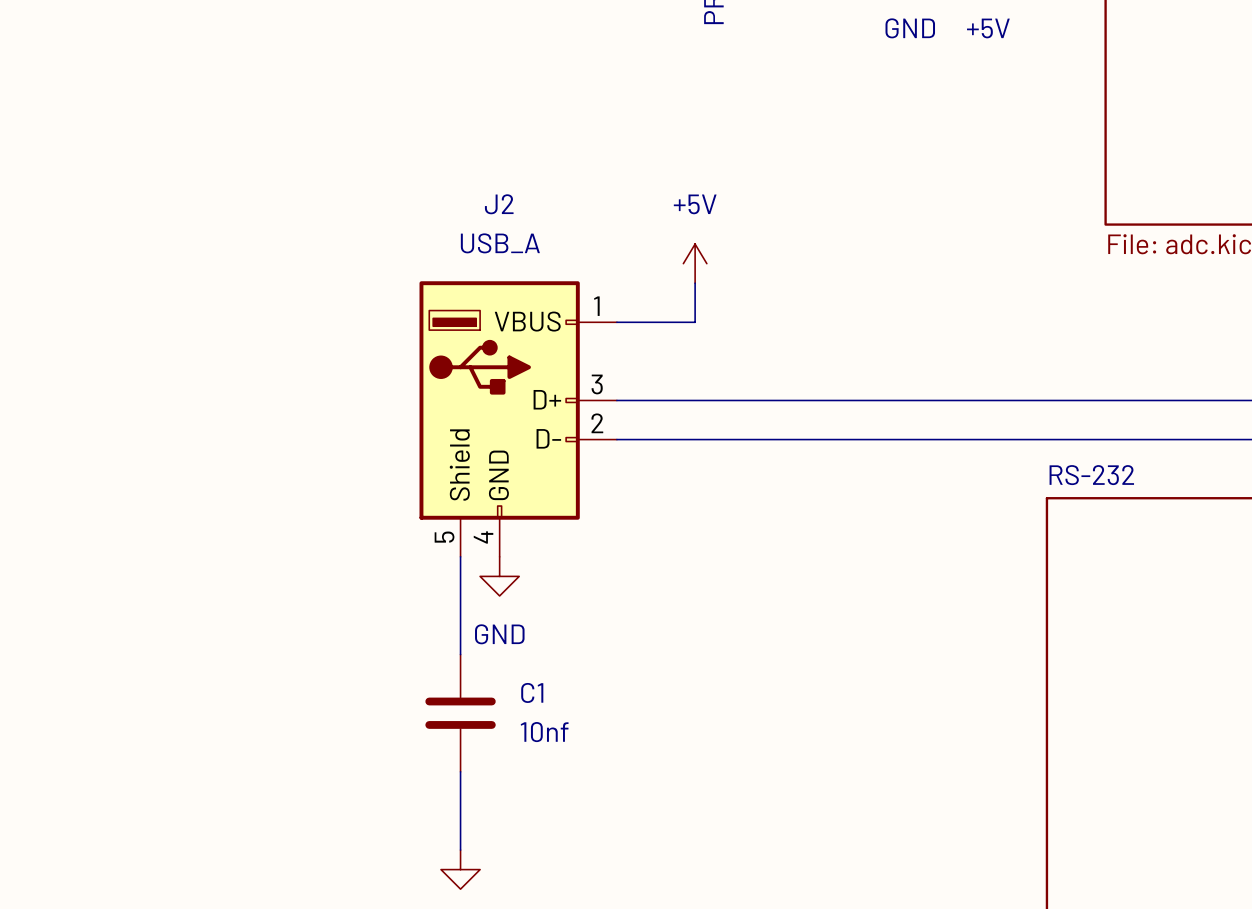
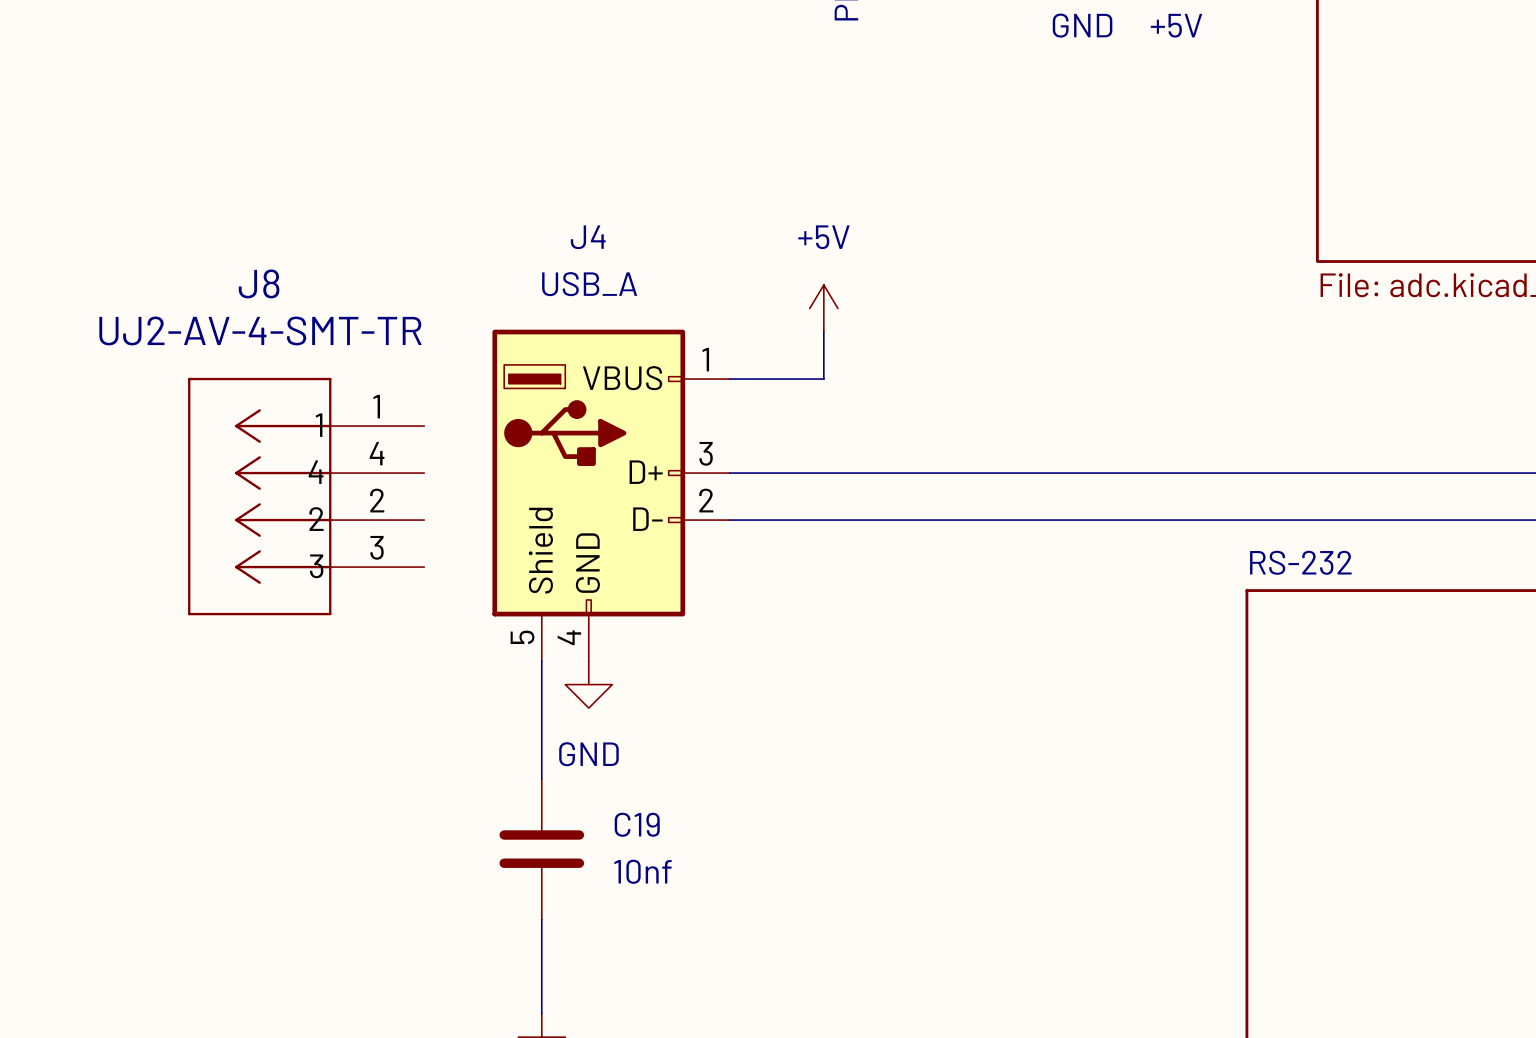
J2 name: J2 (499, 204) -> J4 (588, 237)
J8: none -> UJ2-AV-4-SMT-TR (306, 496)
C1 name: C1 (532, 692) -> C19 (637, 824)

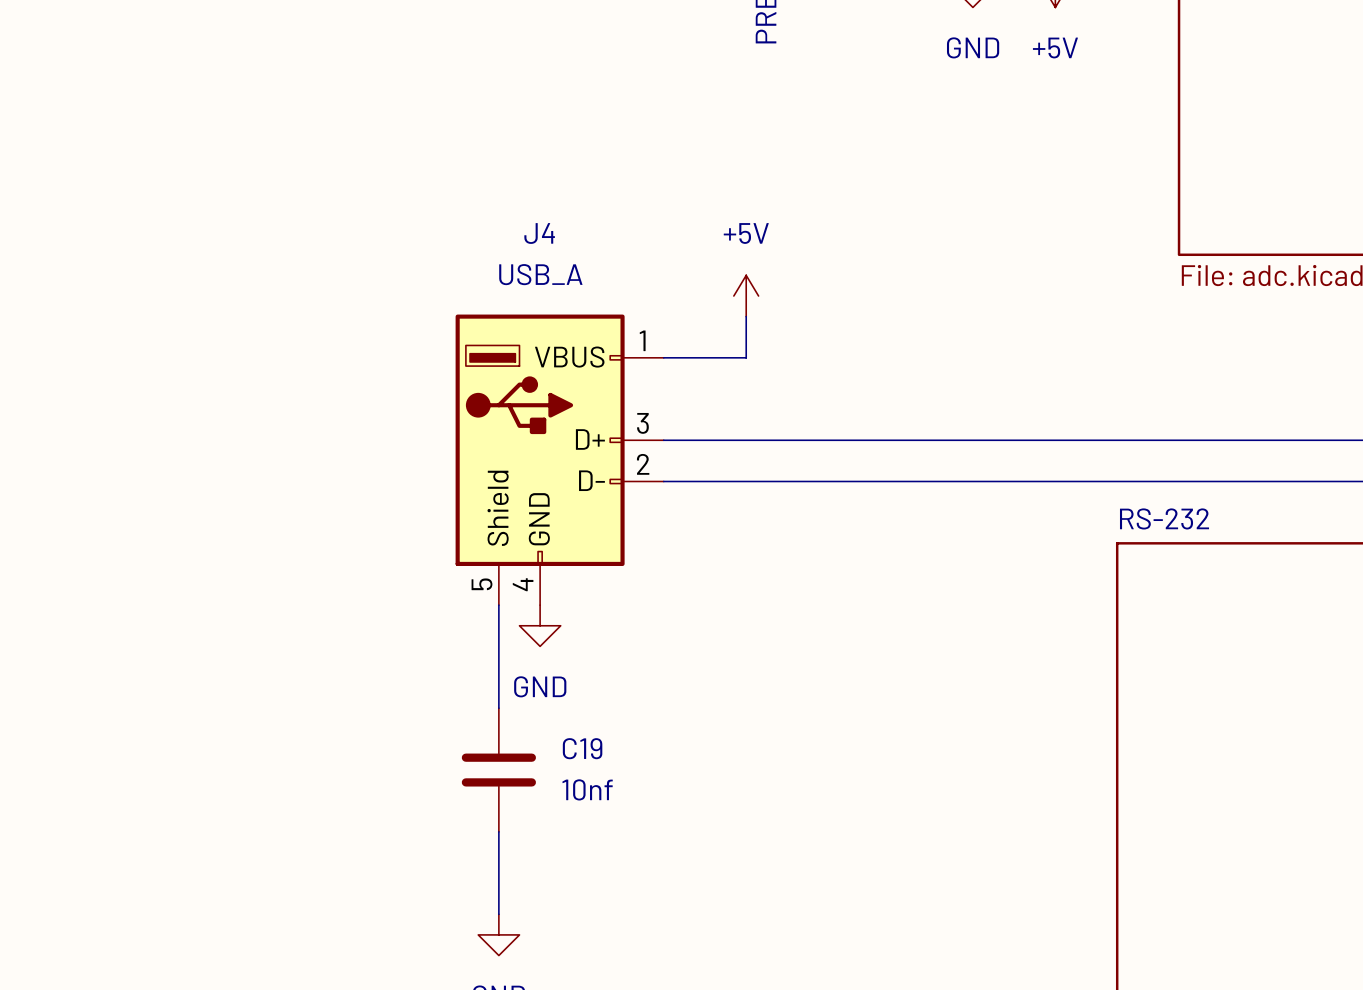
J8: UJ2-AV-4-SMT-TR (306, 496) -> none

